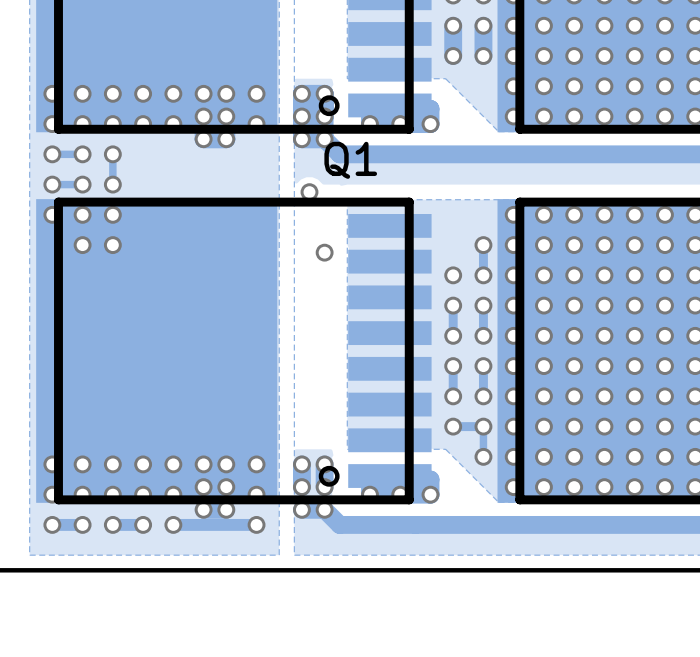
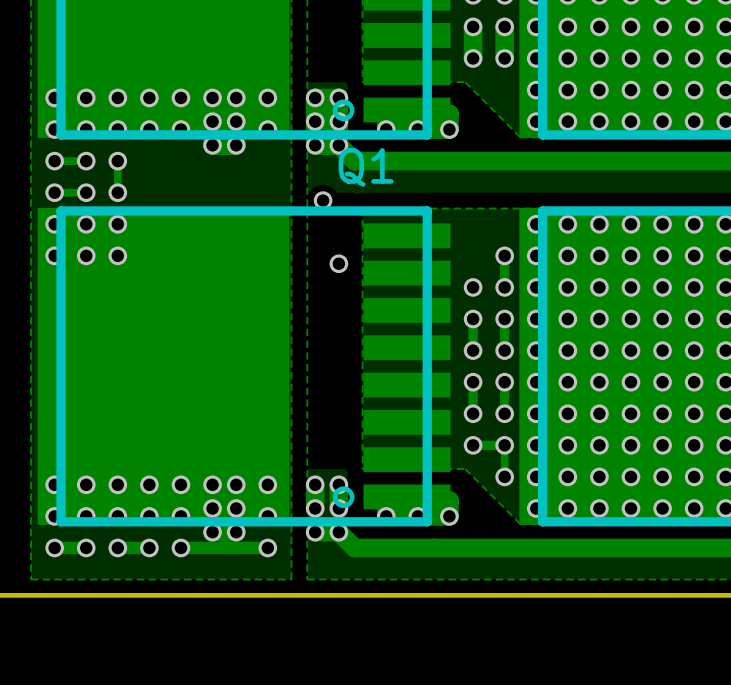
via: none -> (54, 255)

